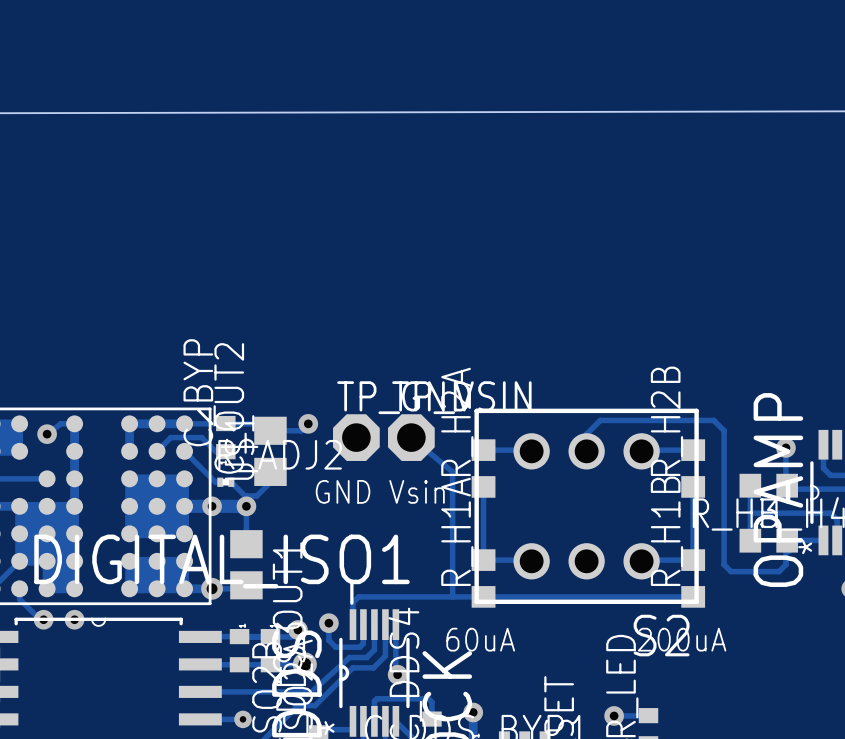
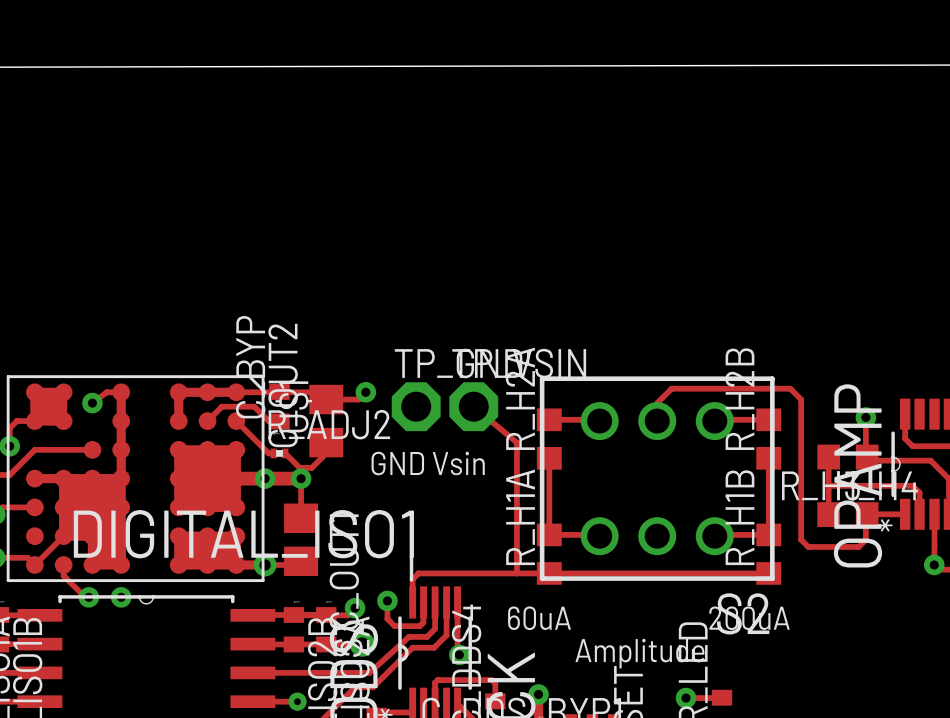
text: none -> Amplitude (639, 653)

